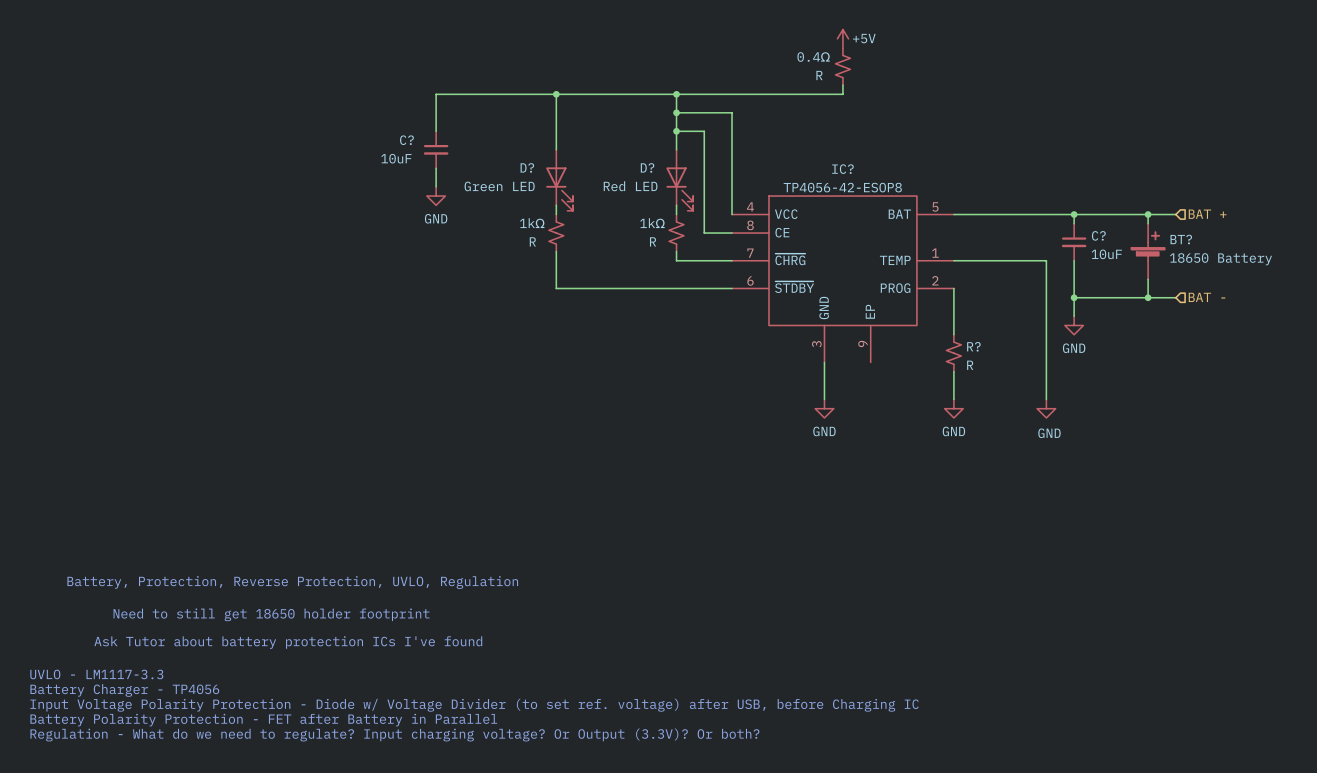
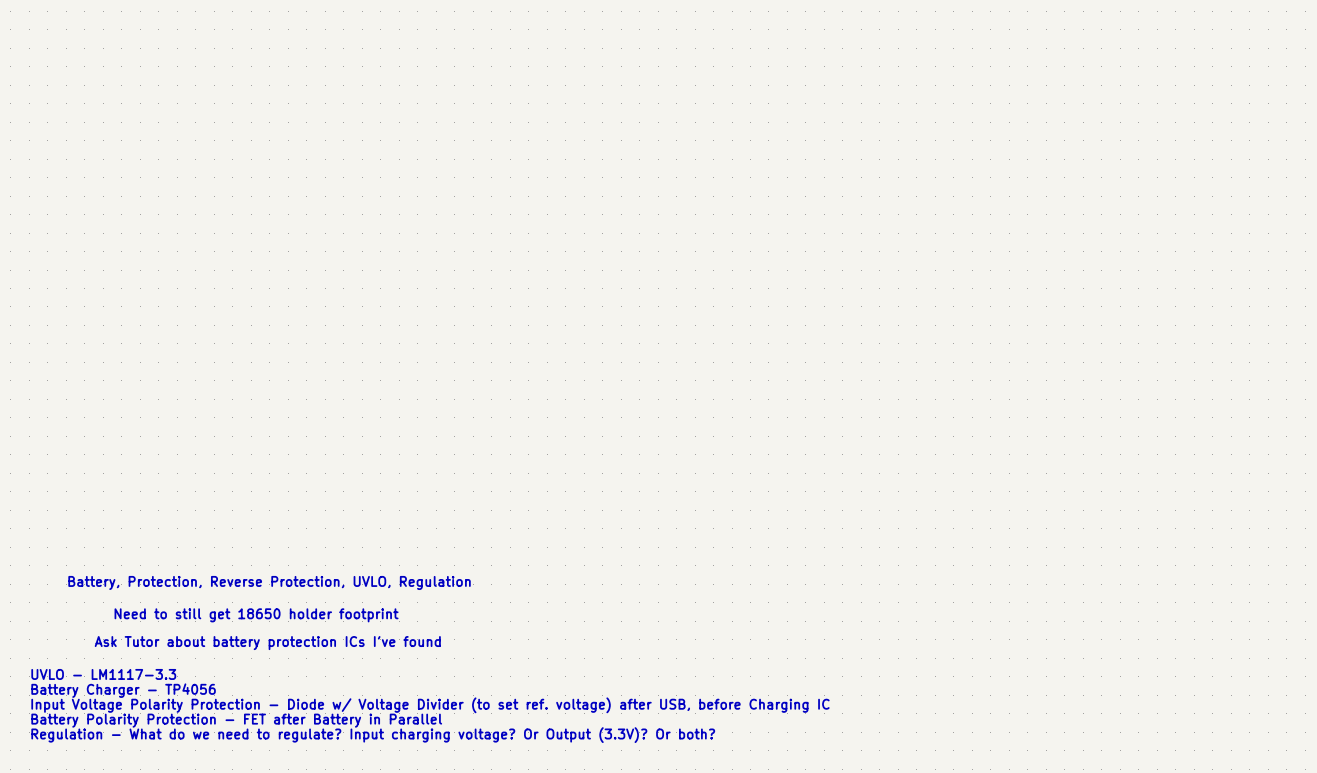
power symbol: +5V (842, 38) -> none
0.4Ω: R (842, 66) -> none
wire: (842, 85) (842, 94) (436, 94) (436, 131) -> none
wire: (556, 94) (556, 149) -> none
junction: (556, 94) -> none
wire: (676, 94) (676, 149) -> none
junction: (676, 94) -> none
wire: (676, 112) (732, 112) (732, 214) -> none
junction: (676, 112) -> none
wire: (676, 131) (704, 131) (704, 233) (732, 233) -> none
junction: (676, 131) -> none
C?: 10uF (436, 149) -> none
wire: (436, 168) (436, 186) -> none
D?: Green LED (559, 180) -> none
D?: Red LED (679, 180) -> none
power symbol: GND (436, 196) -> none
wire: (556, 205) (556, 214) -> none
wire: (676, 205) (676, 214) -> none
wire: (953, 214) (1175, 214) -> none
wire: (1074, 214) (1074, 223) -> none
junction: (1074, 214) -> none
wire: (1148, 214) (1148, 223) -> none
junction: (1148, 214) -> none
hierarchical label: BAT + (1207, 214) -> none
1kΩ: R (556, 233) -> none
1kΩ: R (676, 233) -> none
C?: 10uF (1074, 242) -> none
wire: (556, 251) (556, 288) (732, 288) -> none
wire: (676, 251) (676, 260) (732, 260) -> none
BT?: 18650 Battery (1148, 251) -> none
wire: (953, 260) (1046, 260) (1046, 399) -> none
wire: (1074, 260) (1074, 316) -> none
IC?: TP4056-42-ESOP8 (842, 278) -> none
wire: (1148, 279) (1148, 297) -> none
wire: (953, 288) (953, 334) -> none
wire: (1074, 297) (1175, 297) -> none
junction: (1074, 297) -> none
junction: (1148, 297) -> none
hierarchical label: BAT - (1207, 297) -> none
power symbol: GND (1074, 325) -> none
R?: R (953, 353) -> none
wire: (824, 362) (824, 399) -> none
wire: (953, 371) (953, 399) -> none
power symbol: GND (824, 408) -> none
power symbol: GND (953, 408) -> none
power symbol: GND (1046, 408) -> none

